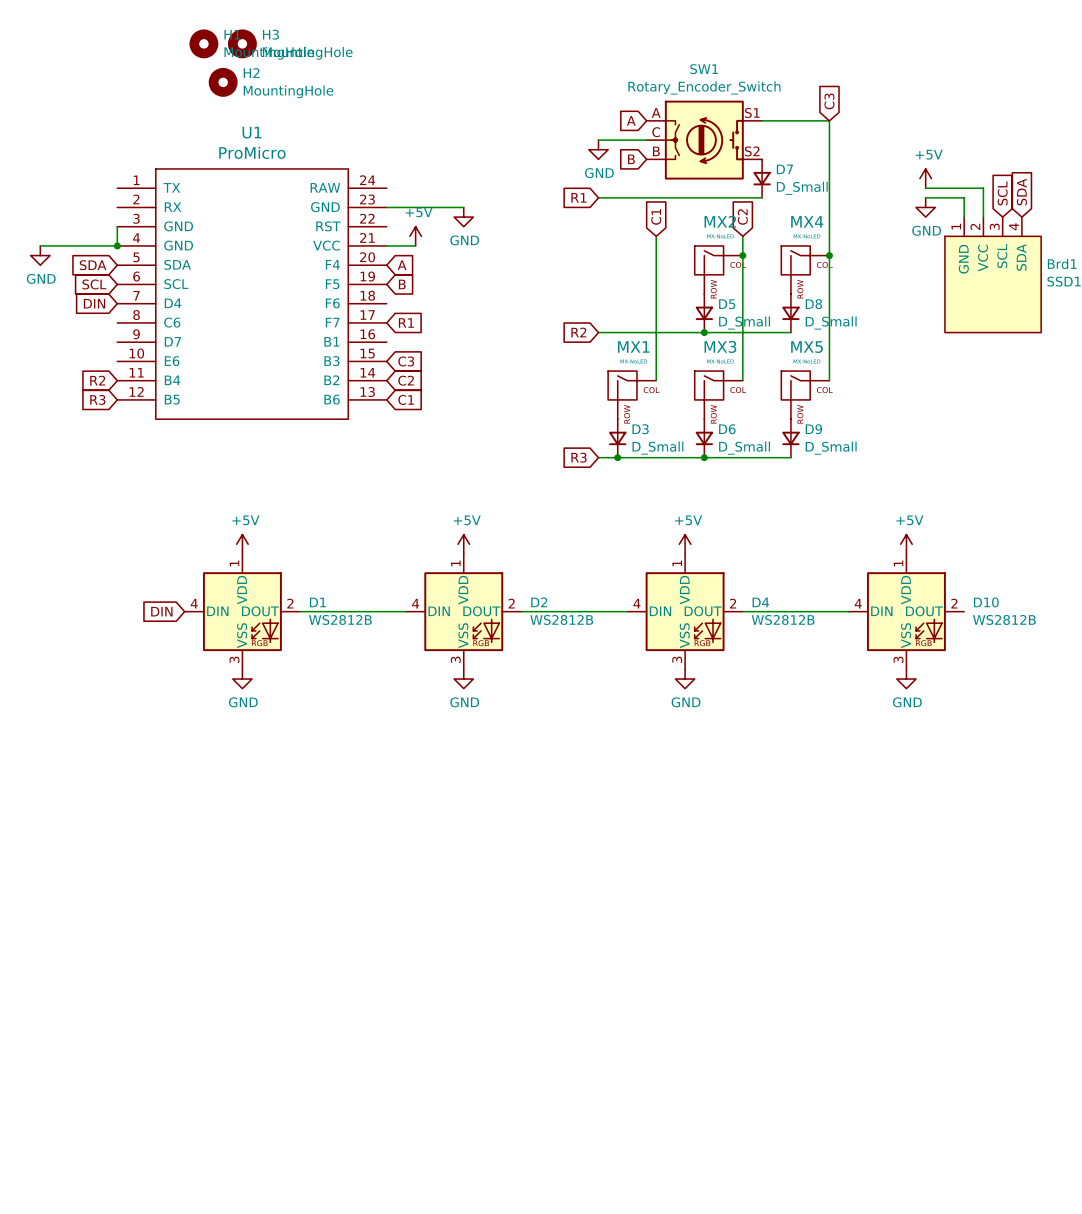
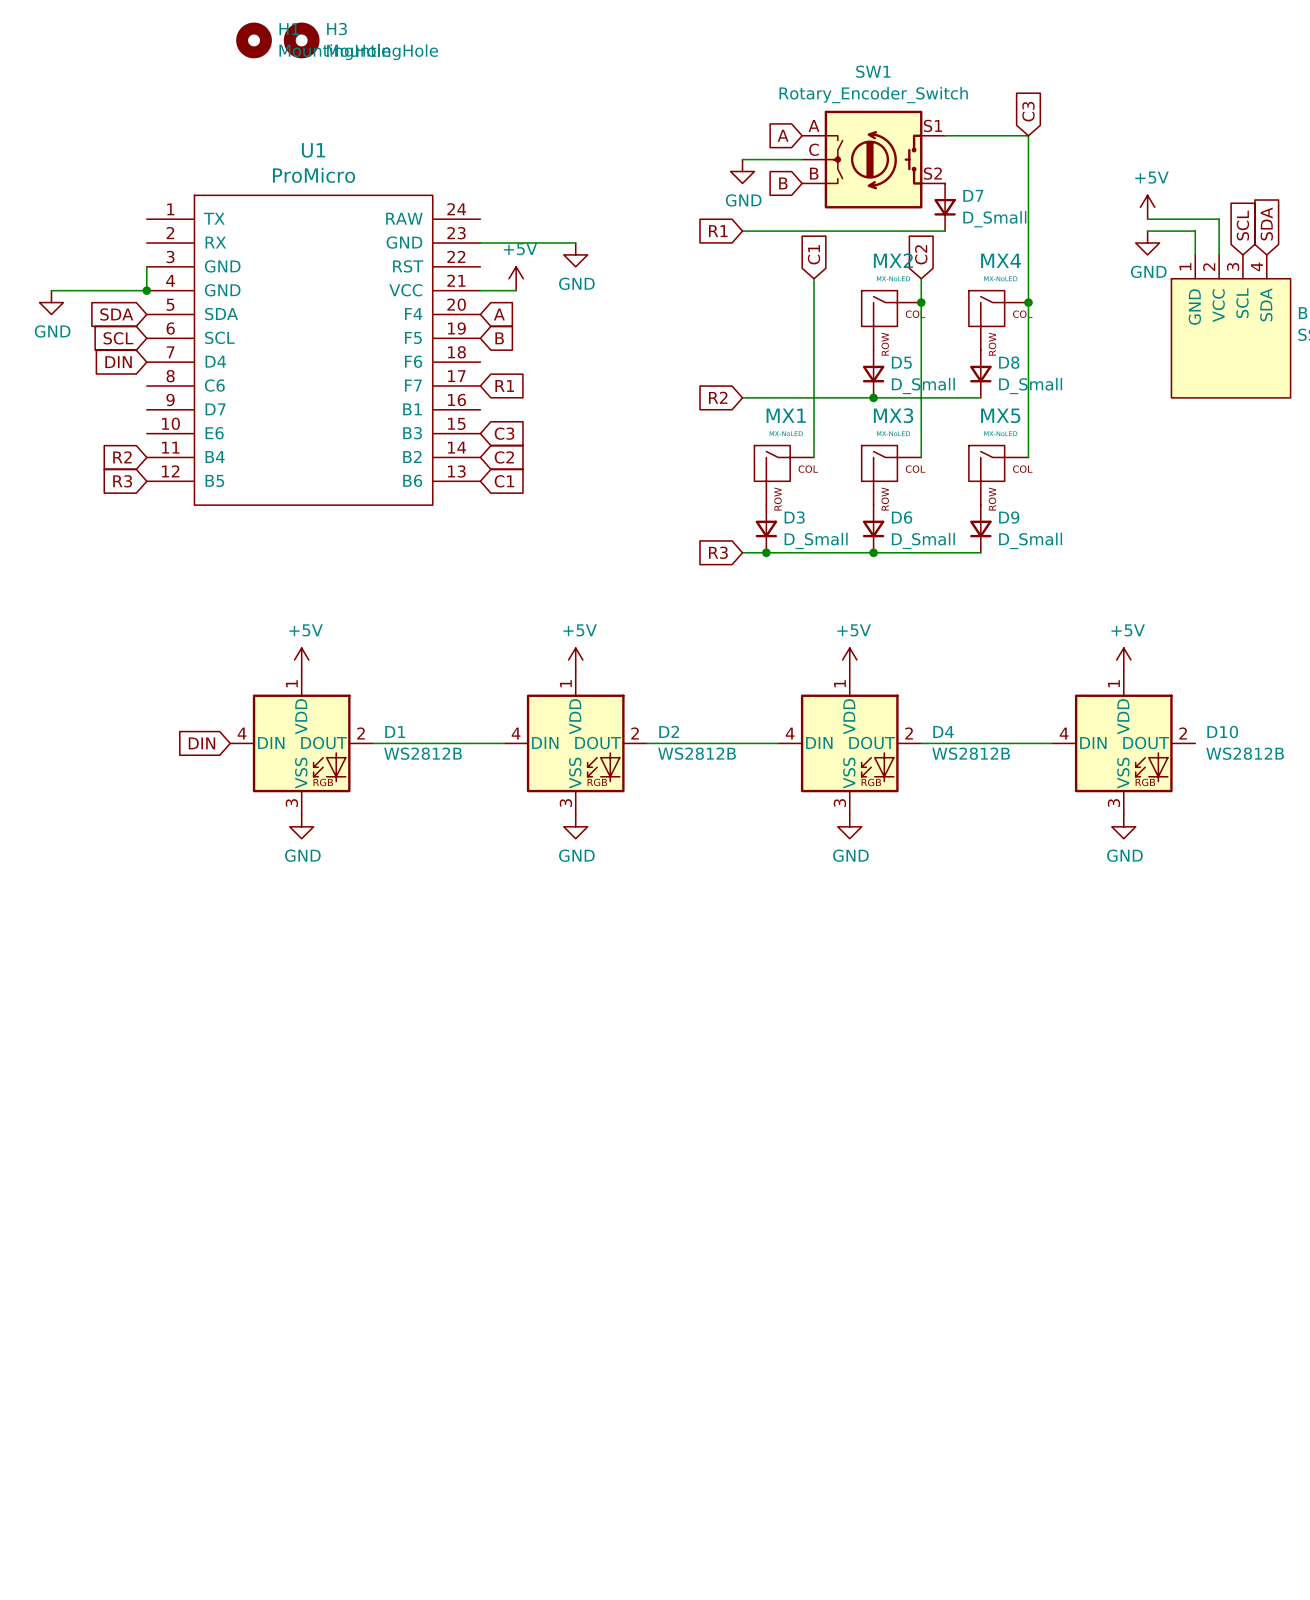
H2: MountingHole (223, 82) -> none

